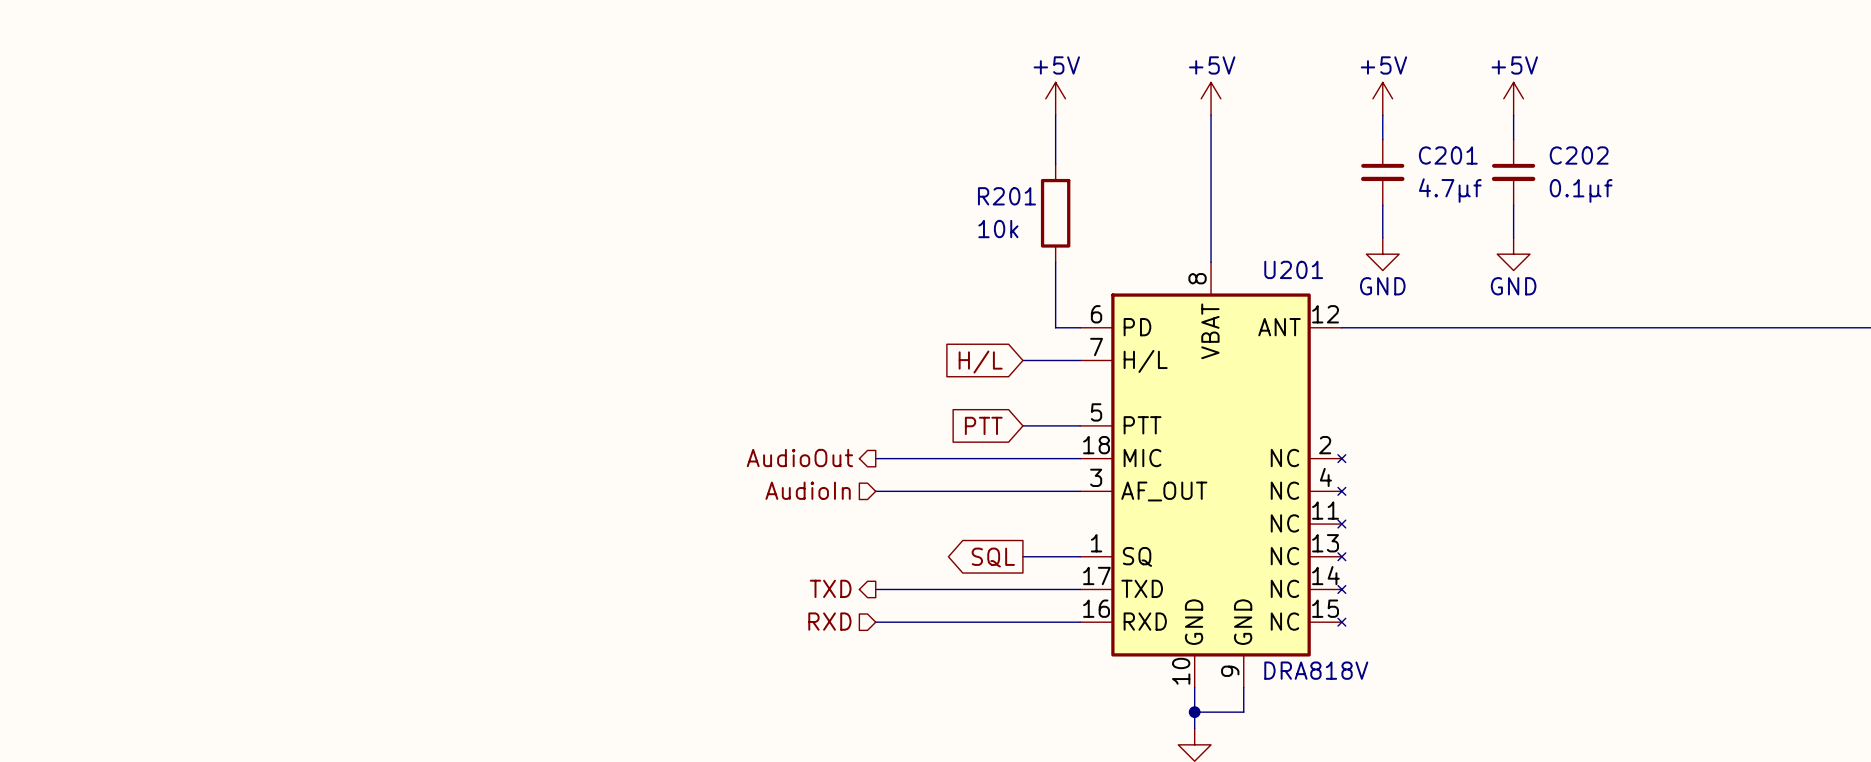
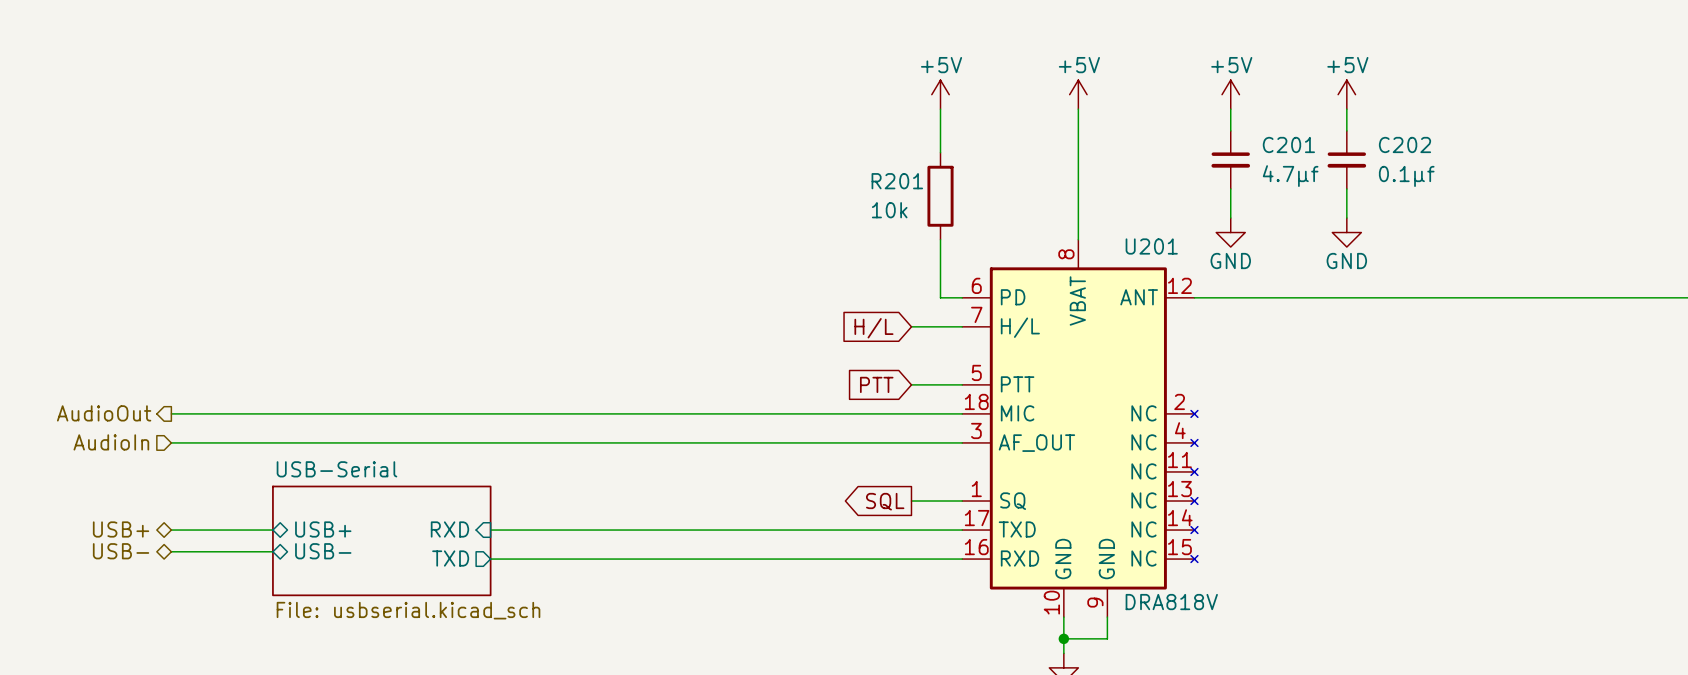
hierarchical label: none -> AudioOut (104, 413)
wire: none -> (171, 413) (780, 413)
hierarchical label: AudioOut (799, 458) -> none
hierarchical label: none -> AudioIn (111, 442)
hierarchical label: AudioIn (808, 490) -> none
wire: none -> (171, 442) (780, 442)
hierarchical label: none -> USB+ (121, 529)
sheet pin: none -> USB+ (323, 529)
sheet pin: none -> RXD (449, 529)
hierarchical label: TXD (830, 588) -> none
wire: none -> (171, 530) (272, 530)
wire: none -> (490, 530) (780, 530)
sheet USB-Serial: none -> File: usbserial.kicad_sch (381, 540)
hierarchical label: none -> USB- (121, 551)
sheet pin: none -> USB- (323, 551)
wire: none -> (171, 551) (272, 551)
sheet pin: none -> TXD (450, 558)
hierarchical label: RXD (829, 621) -> none
wire: none -> (490, 559) (780, 559)

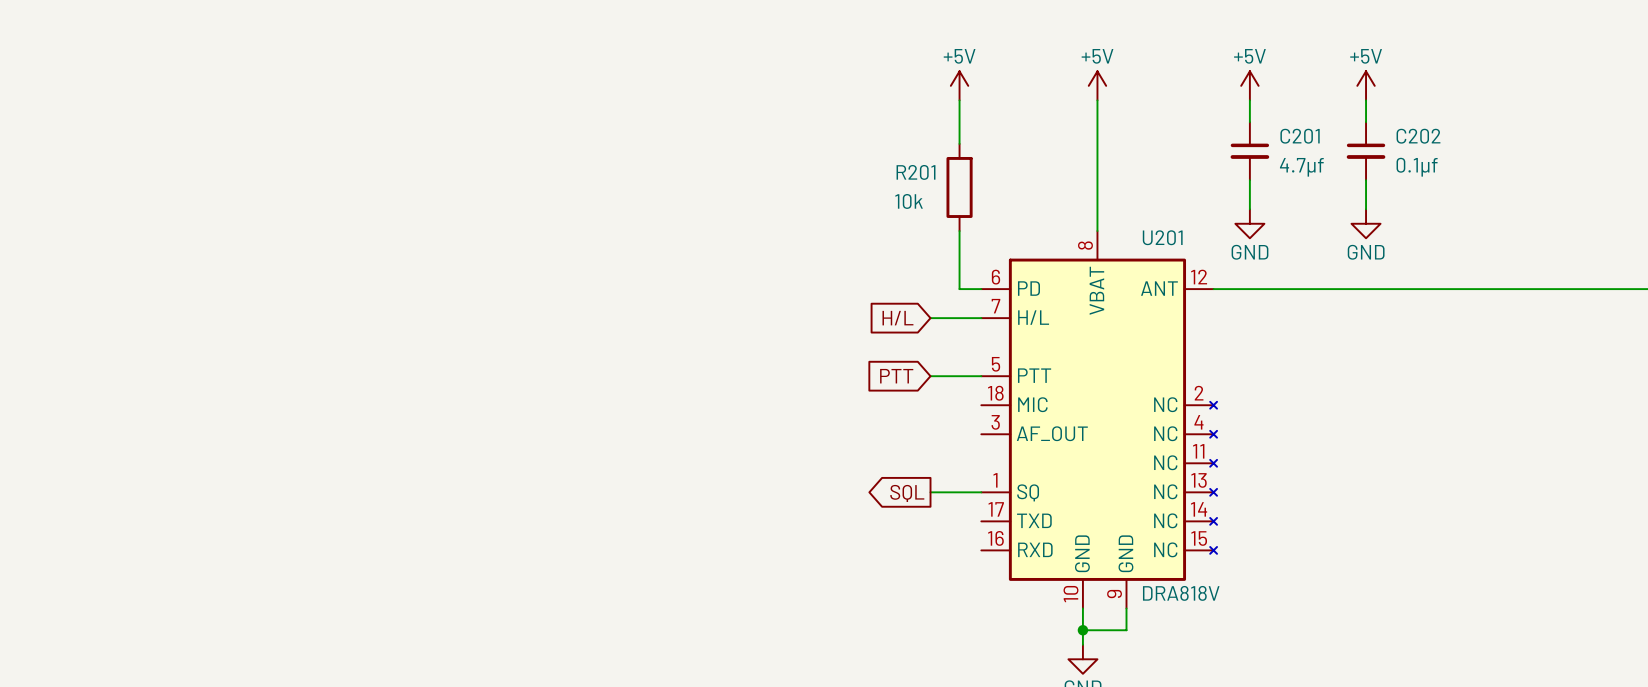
hierarchical label: AudioOut (104, 413) -> none
wire: (171, 413) (962, 413) -> none
hierarchical label: AudioIn (111, 442) -> none
wire: (171, 442) (962, 442) -> none
hierarchical label: USB+ (121, 529) -> none
sheet pin: USB+ (323, 529) -> none
sheet pin: RXD (449, 529) -> none
wire: (171, 530) (272, 530) -> none
wire: (490, 530) (962, 530) -> none
sheet USB-Serial: File: usbserial.kicad_sch (381, 540) -> none
hierarchical label: USB- (121, 551) -> none
wire: (171, 551) (272, 551) -> none
sheet pin: USB- (323, 551) -> none
sheet pin: TXD (450, 558) -> none
wire: (490, 559) (962, 559) -> none

